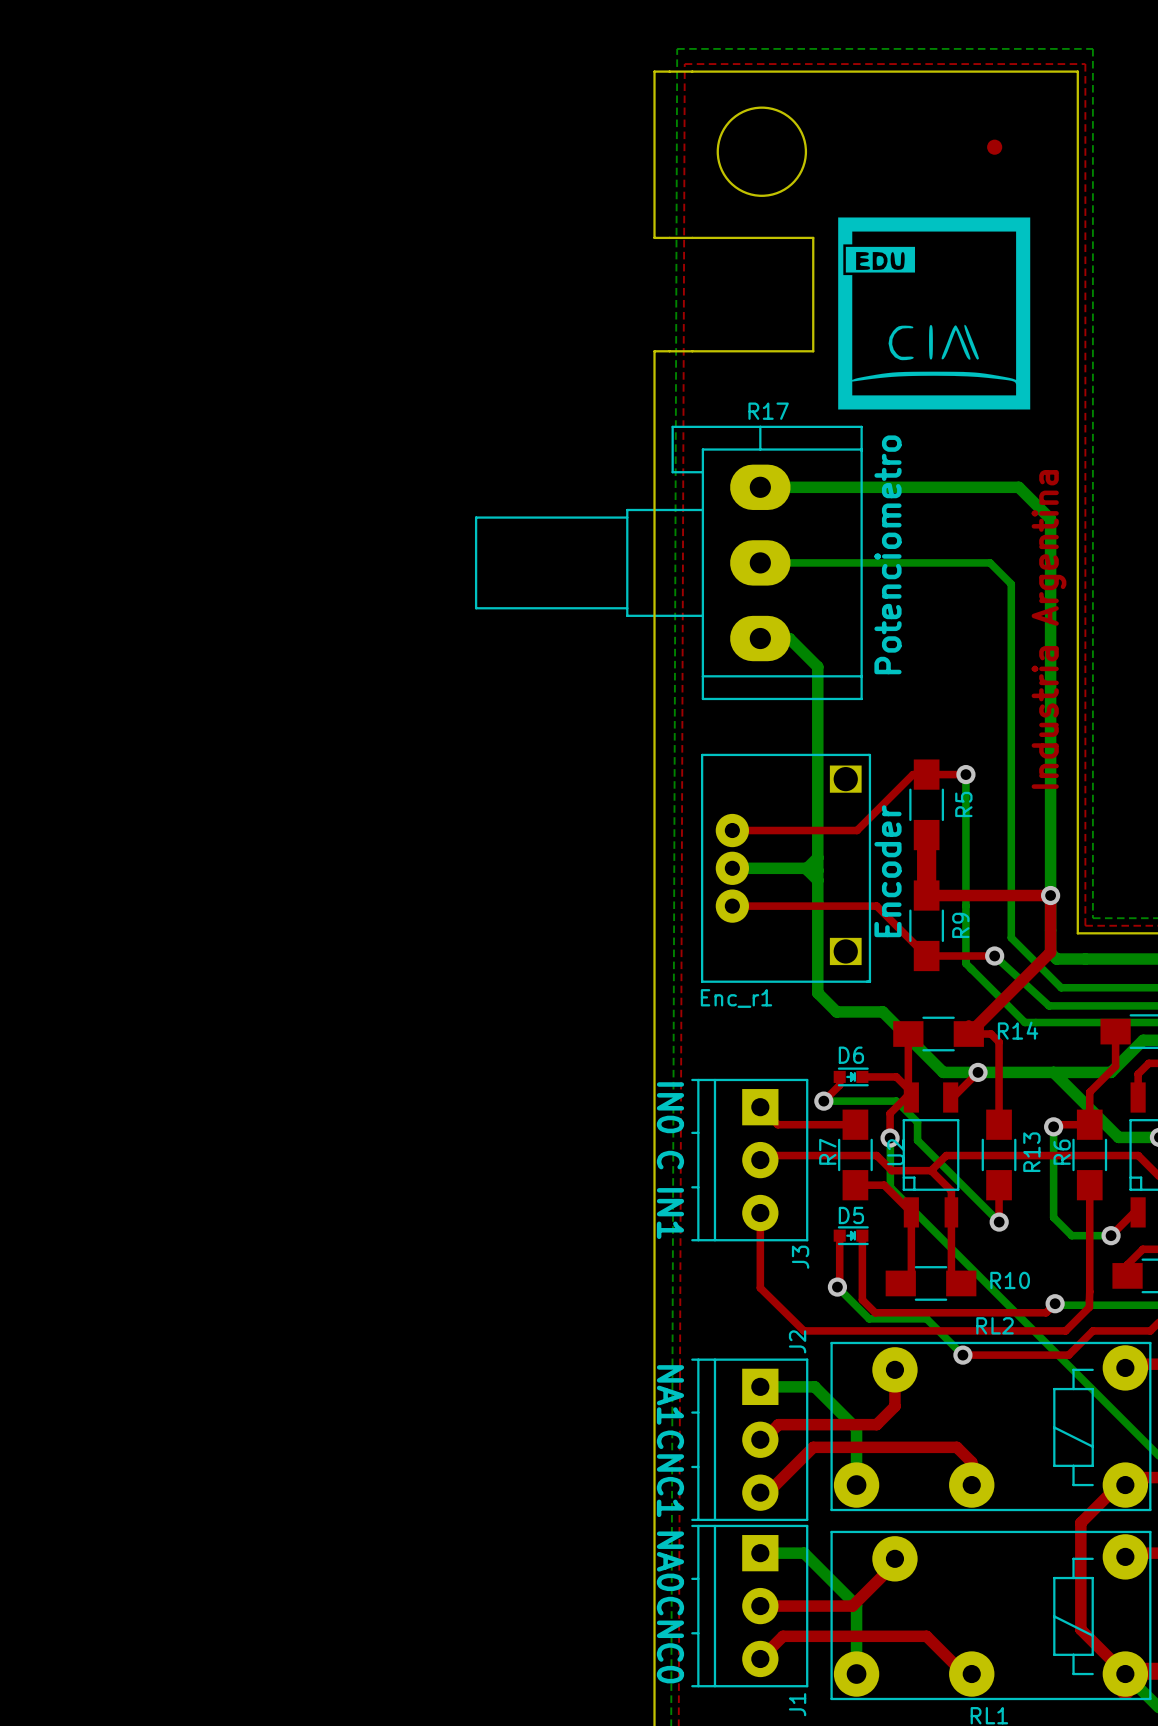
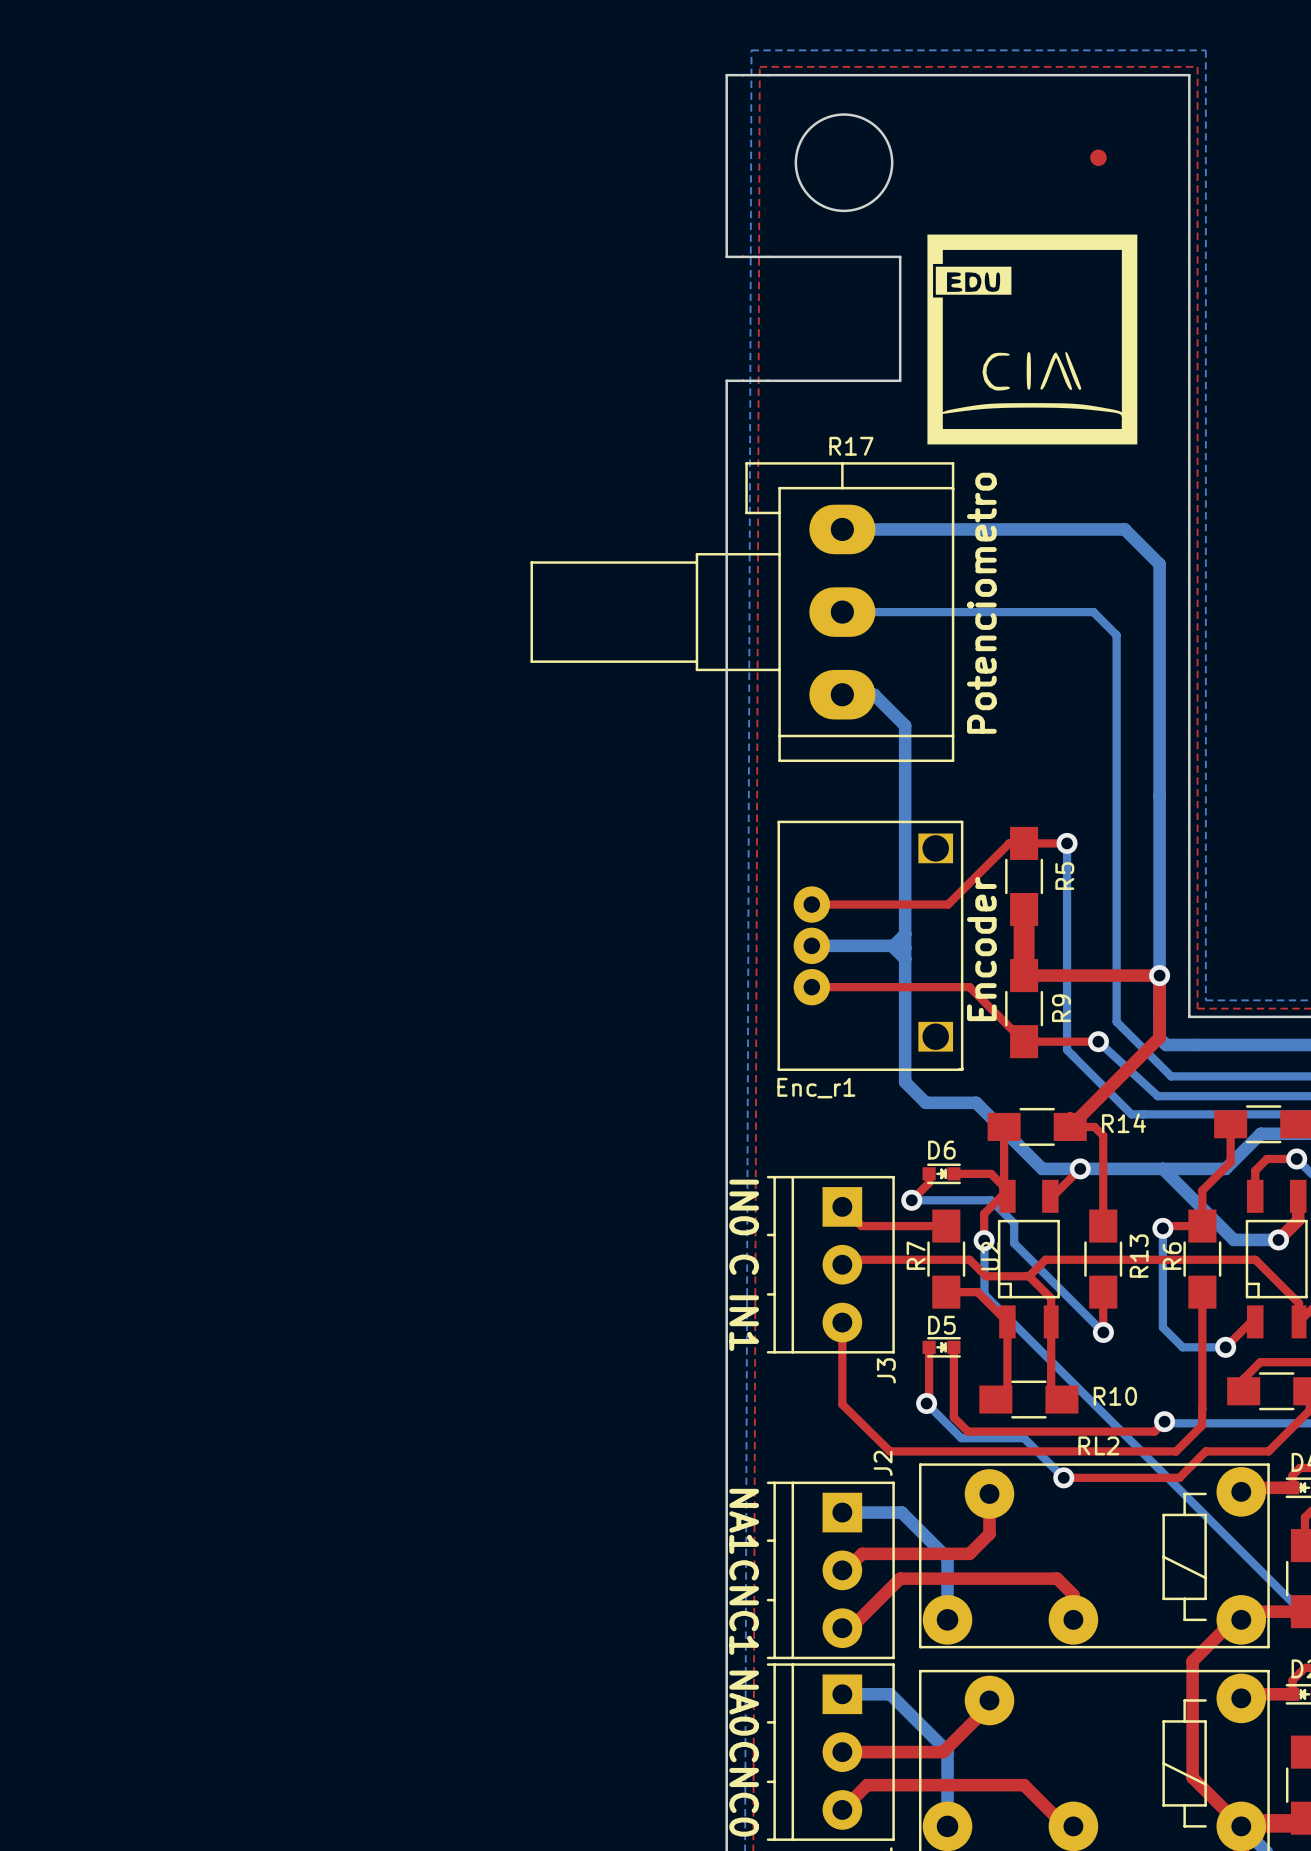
text: Industria Argentina (1048, 629) -> none

